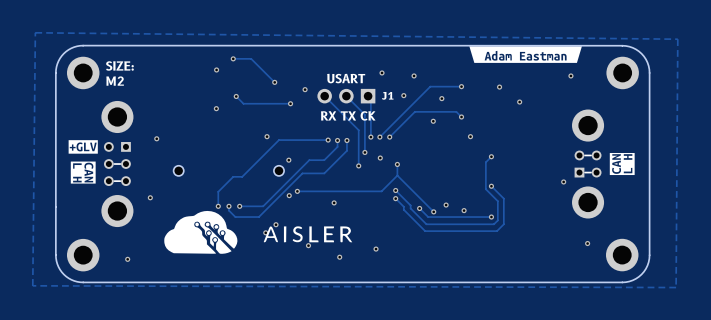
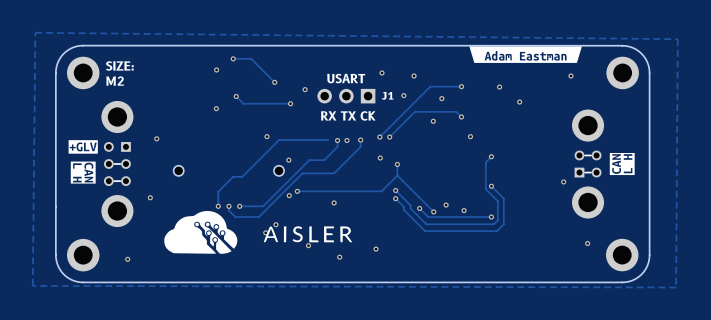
track: (324, 96) (358, 130) (358, 165) -> none
track: (346, 96) (364, 114) (364, 152) -> none
track: (368, 96) (370, 98) (370, 137) -> none
via: (370, 137) -> none
via: (328, 140) -> none
track: (346, 140) (346, 150) (324, 173) -> (360, 140) (360, 146) (334, 173) (324, 173)
via: none -> (360, 140)
via: (364, 152) -> none
via: (358, 165) -> none

